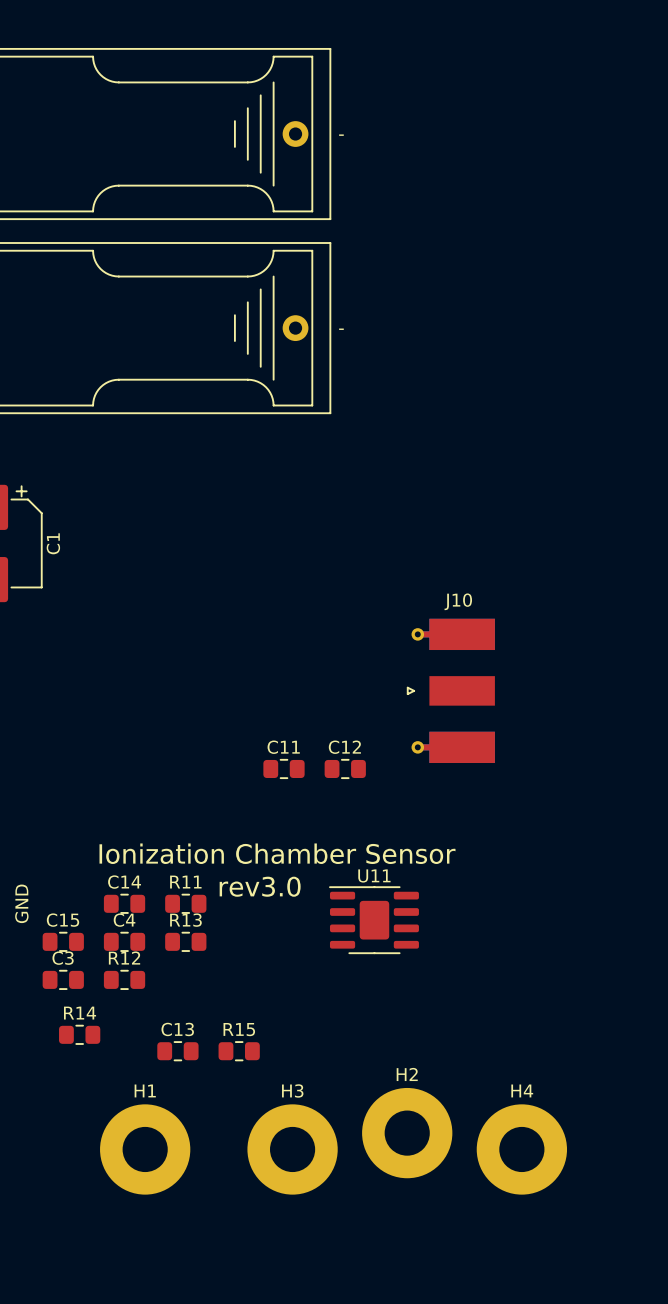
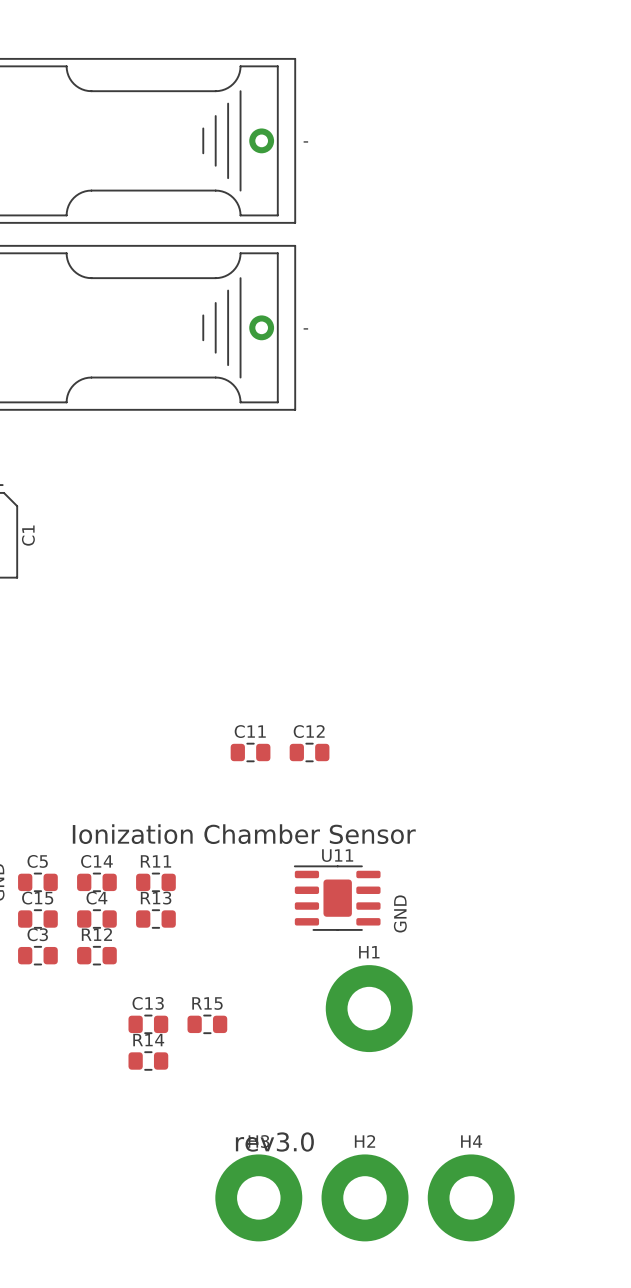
J10: (450, 690) -> none
text position: rev3.0 (260, 886) -> rev3.0 (274, 1142)
C5: none -> (37, 882)
text: none -> GND (400, 913)
R14 position: (79, 1034) -> (148, 1061)
H2 position: (407, 1133) -> (365, 1197)
H1 position: (145, 1149) -> (369, 1008)
H3 position: (292, 1149) -> (258, 1197)
H4 position: (521, 1149) -> (471, 1197)

